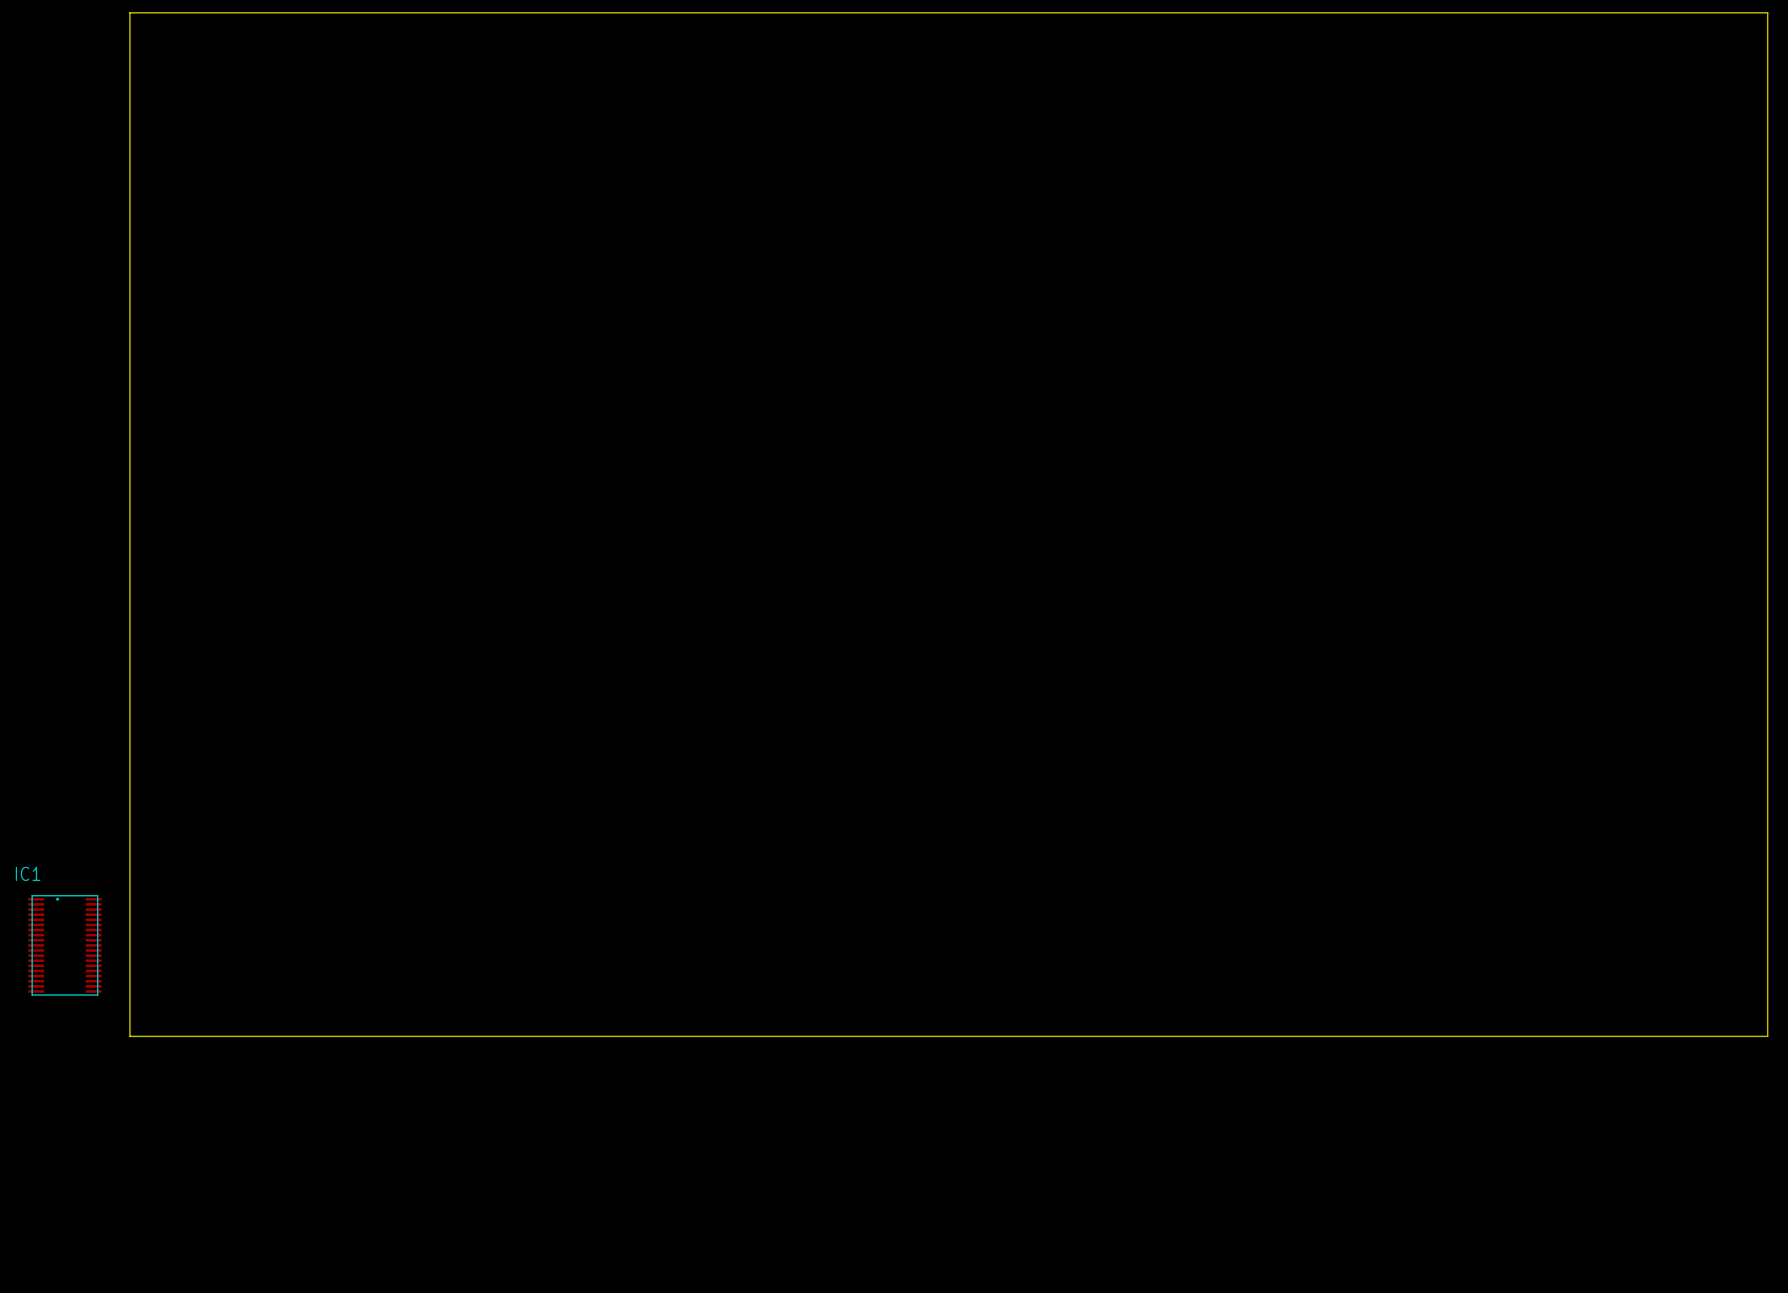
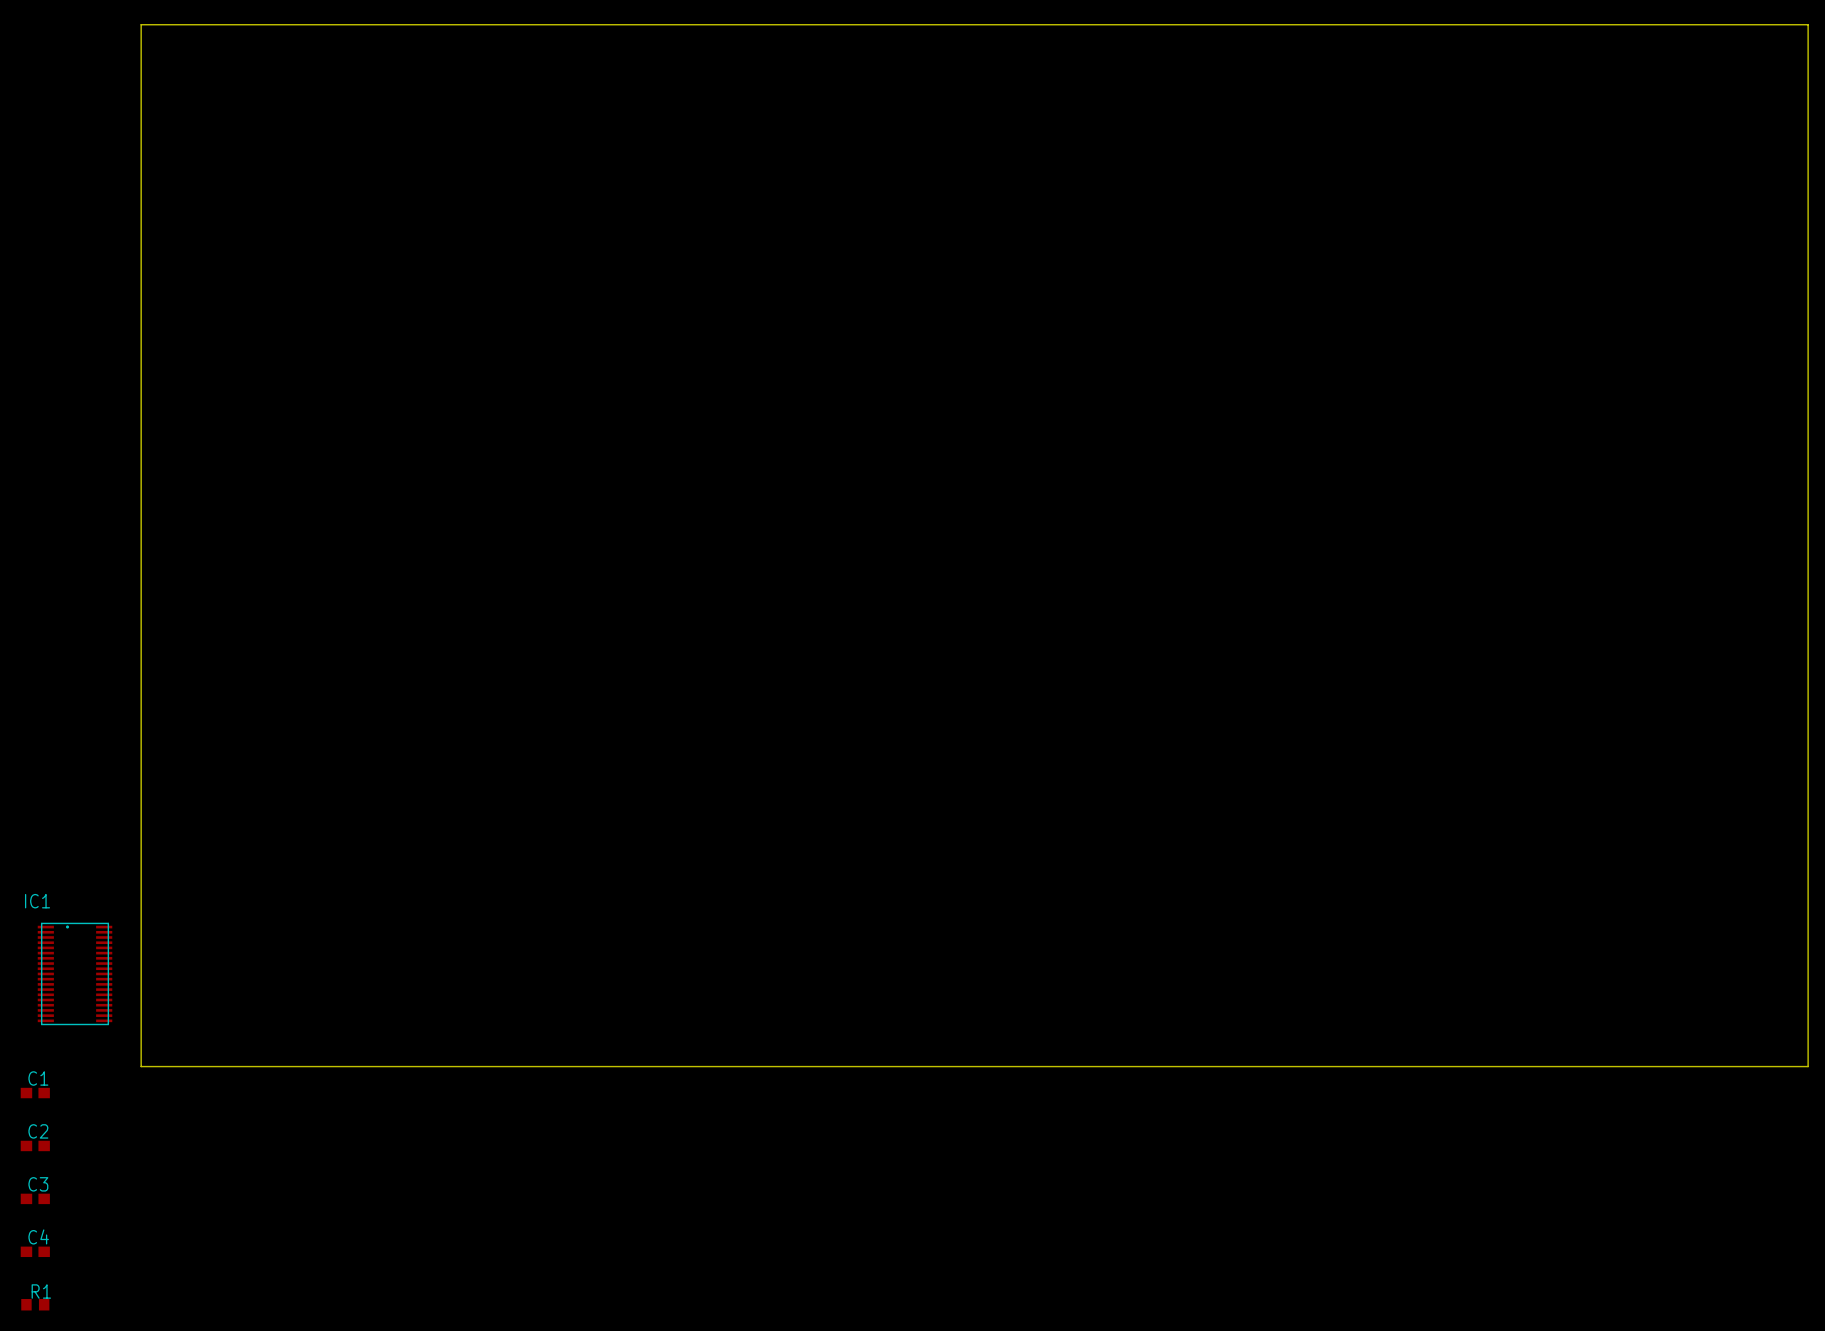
C1: none -> (35, 1093)
C2: none -> (35, 1145)
C3: none -> (35, 1198)
C4: none -> (35, 1251)
R1: none -> (35, 1304)

